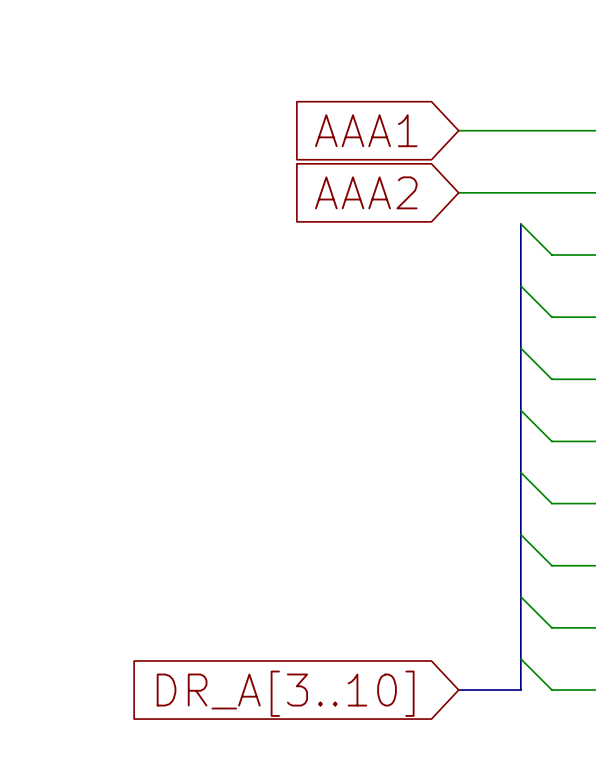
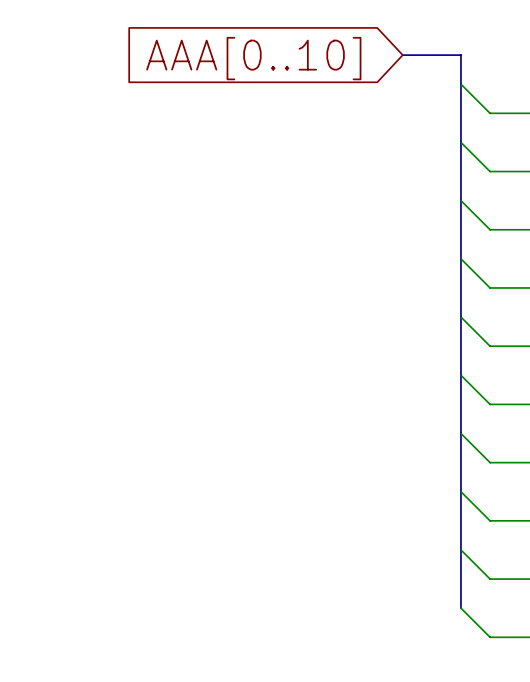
bus: none -> (402, 55) (460, 55) (460, 200)
global label: none -> AAA[0..10] (253, 58)
global label: AAA1 (366, 130) -> none
wire: (458, 130) (551, 130) -> (460, 84) (490, 113)
global label: AAA2 (366, 192) -> none
wire: (458, 192) (551, 192) -> (460, 142) (490, 171)
bus: (520, 658) (520, 690) (458, 690) -> none
global label: DR_A[3..10] (285, 693) -> none

